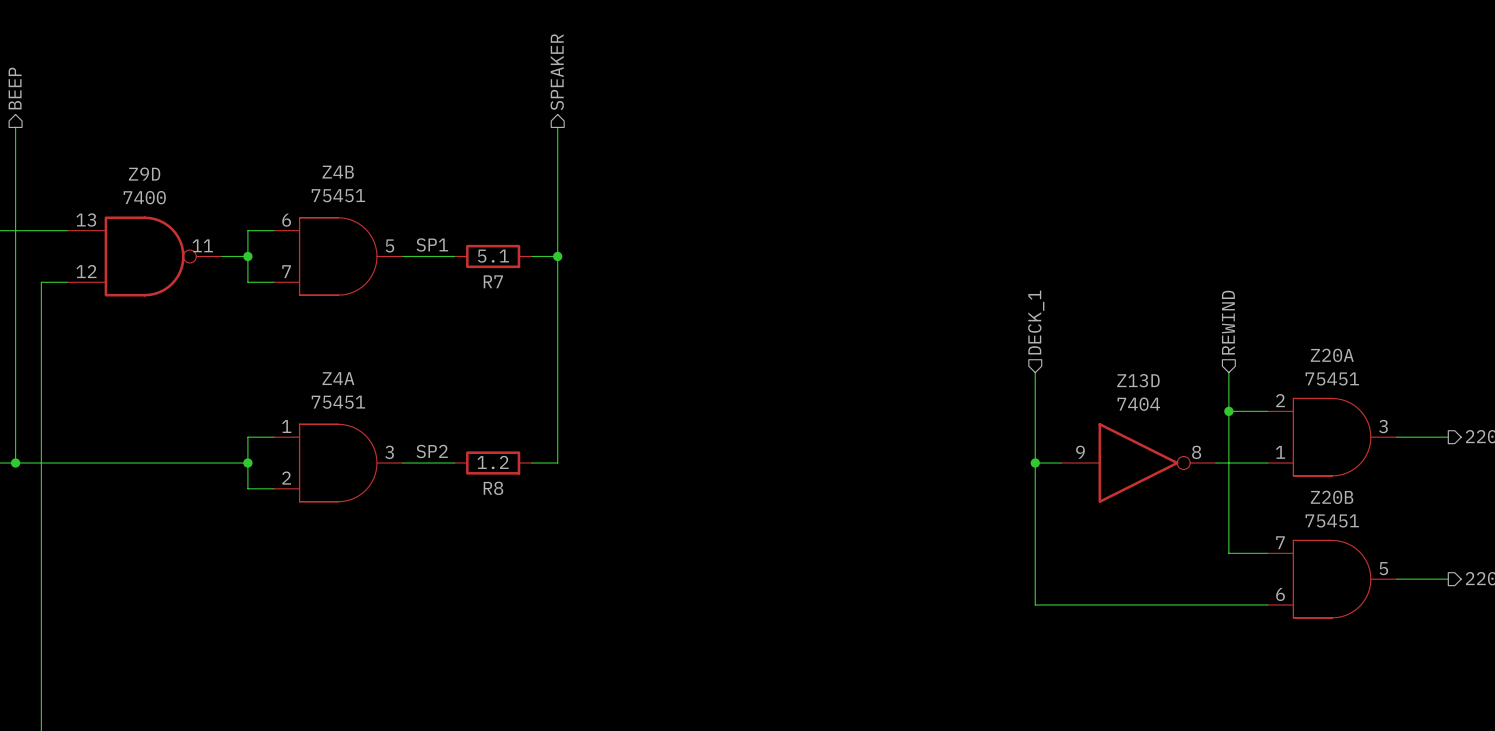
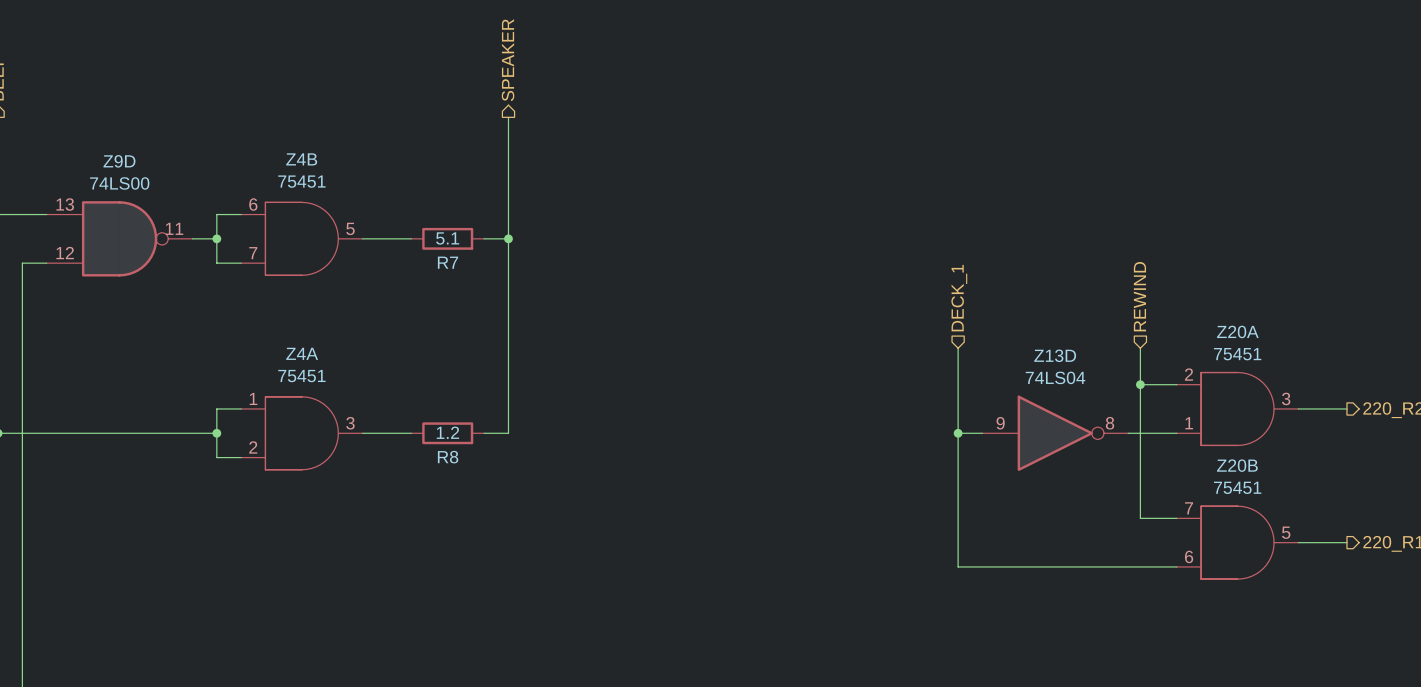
Z9D value: 7400 (144, 197) -> 74LS00 (119, 183)
label: SP1 (432, 244) -> none
Z13D value: 7404 (1138, 404) -> 74LS04 (1055, 377)
label: SP2 (432, 451) -> none

